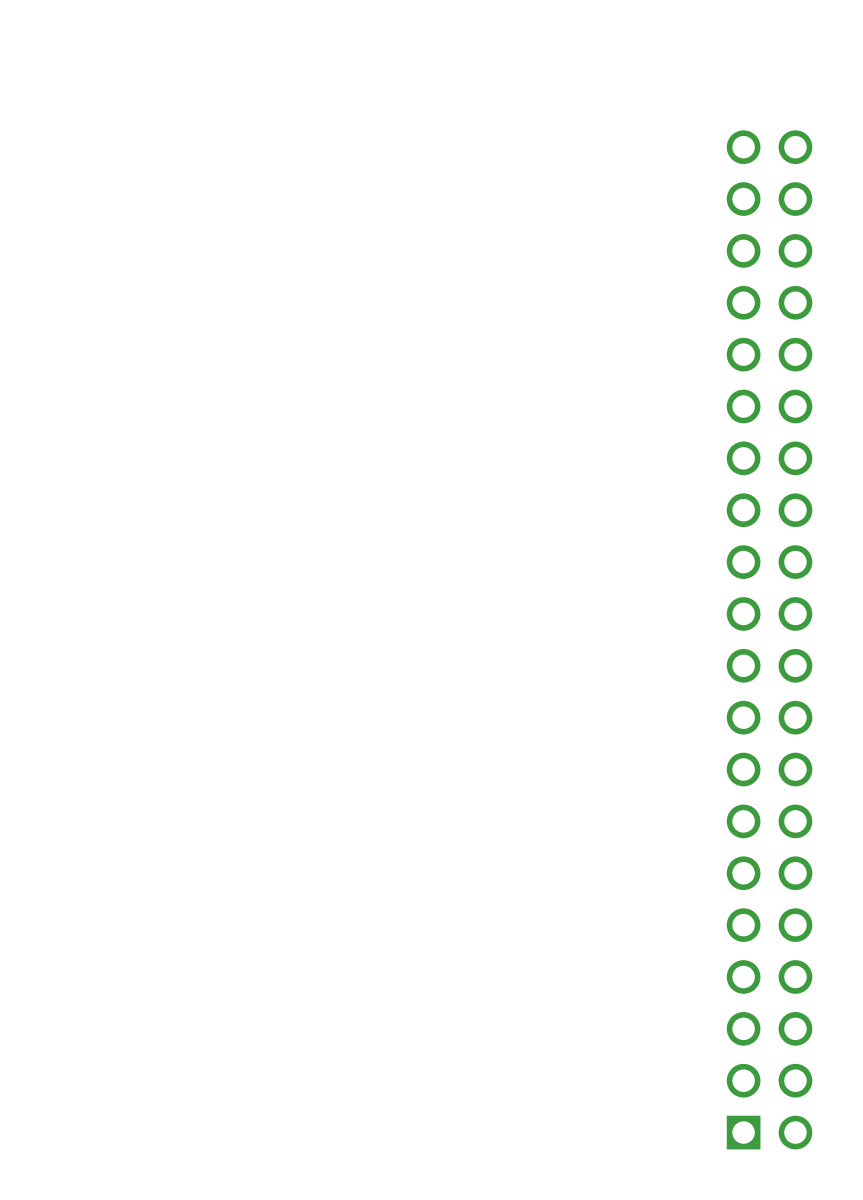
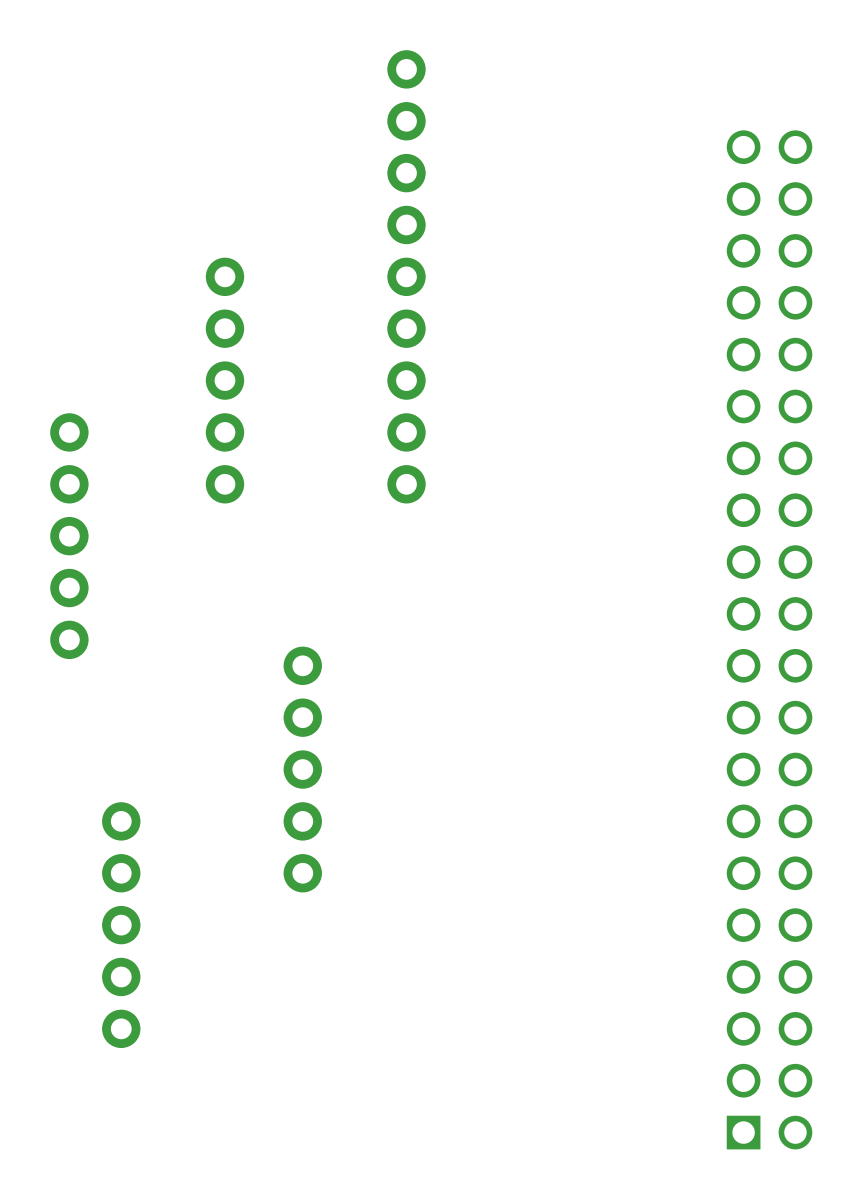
part: none -> (406, 276)
part: none -> (224, 380)
part: none -> (69, 536)
part: none -> (302, 769)
part: none -> (121, 925)

